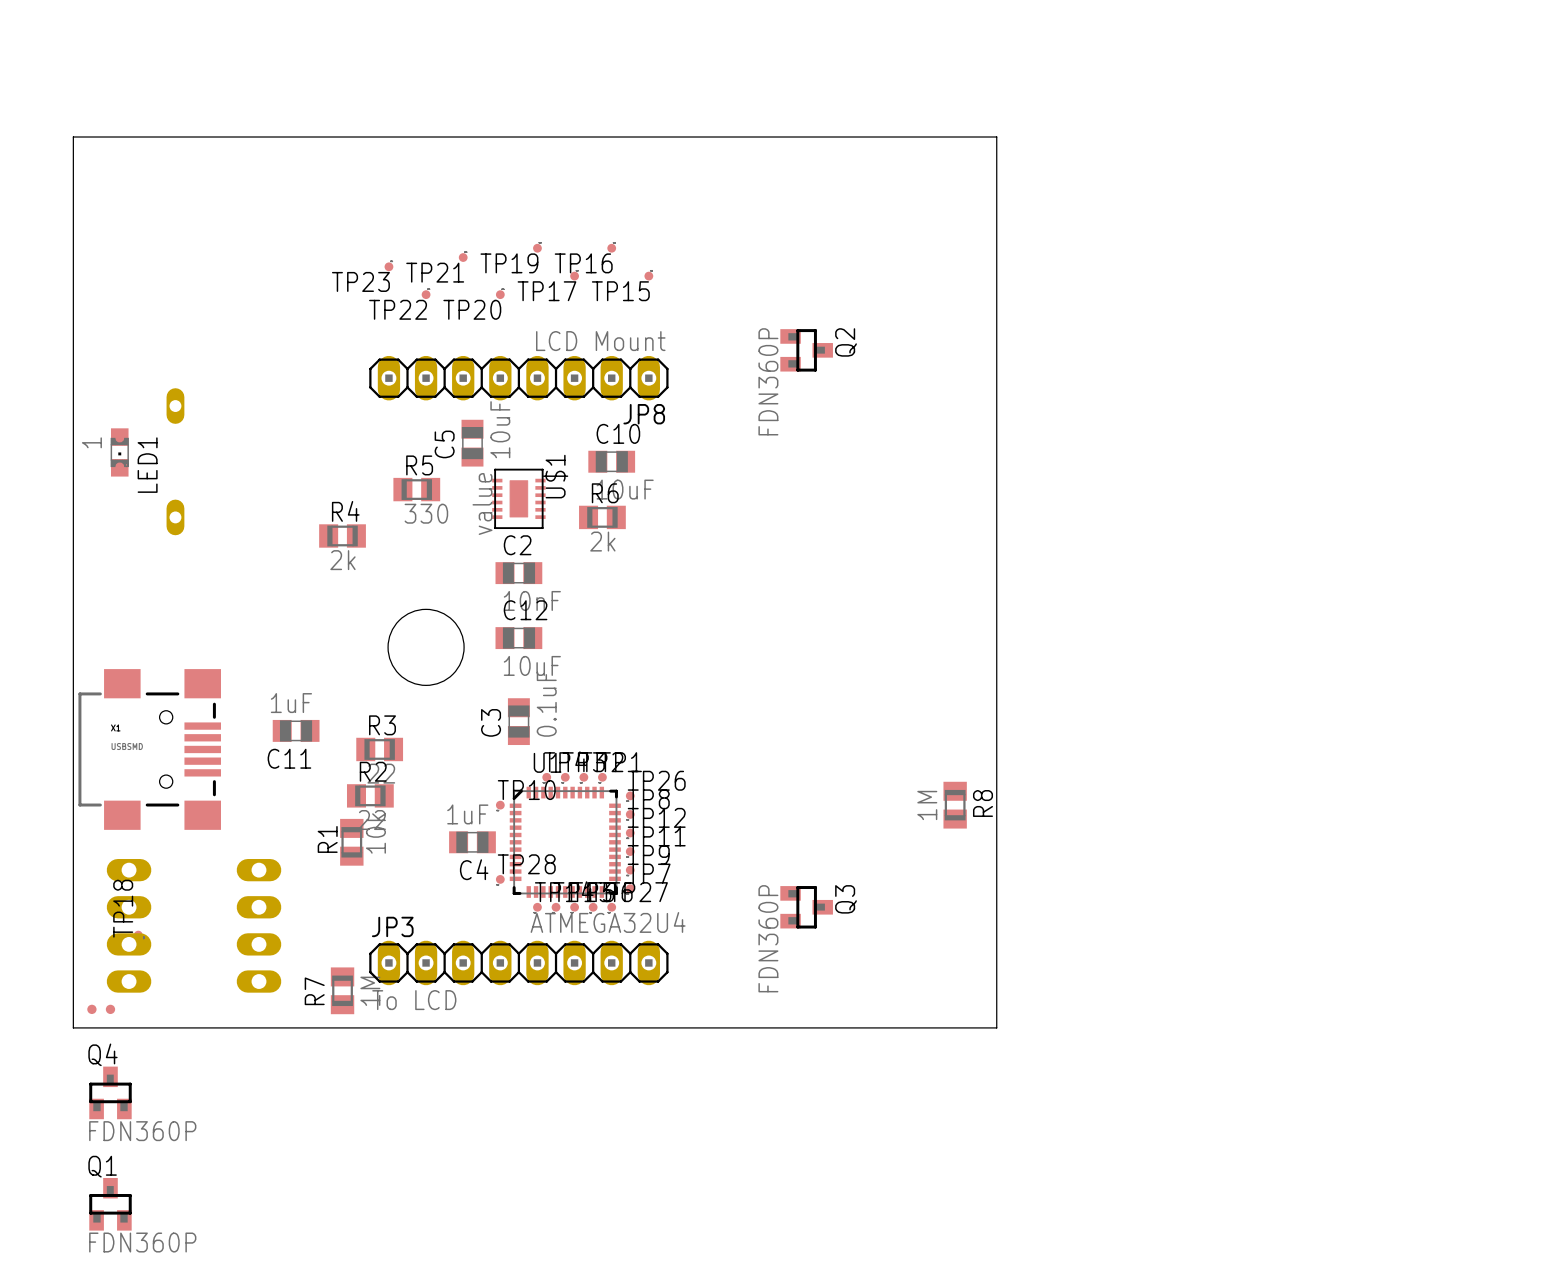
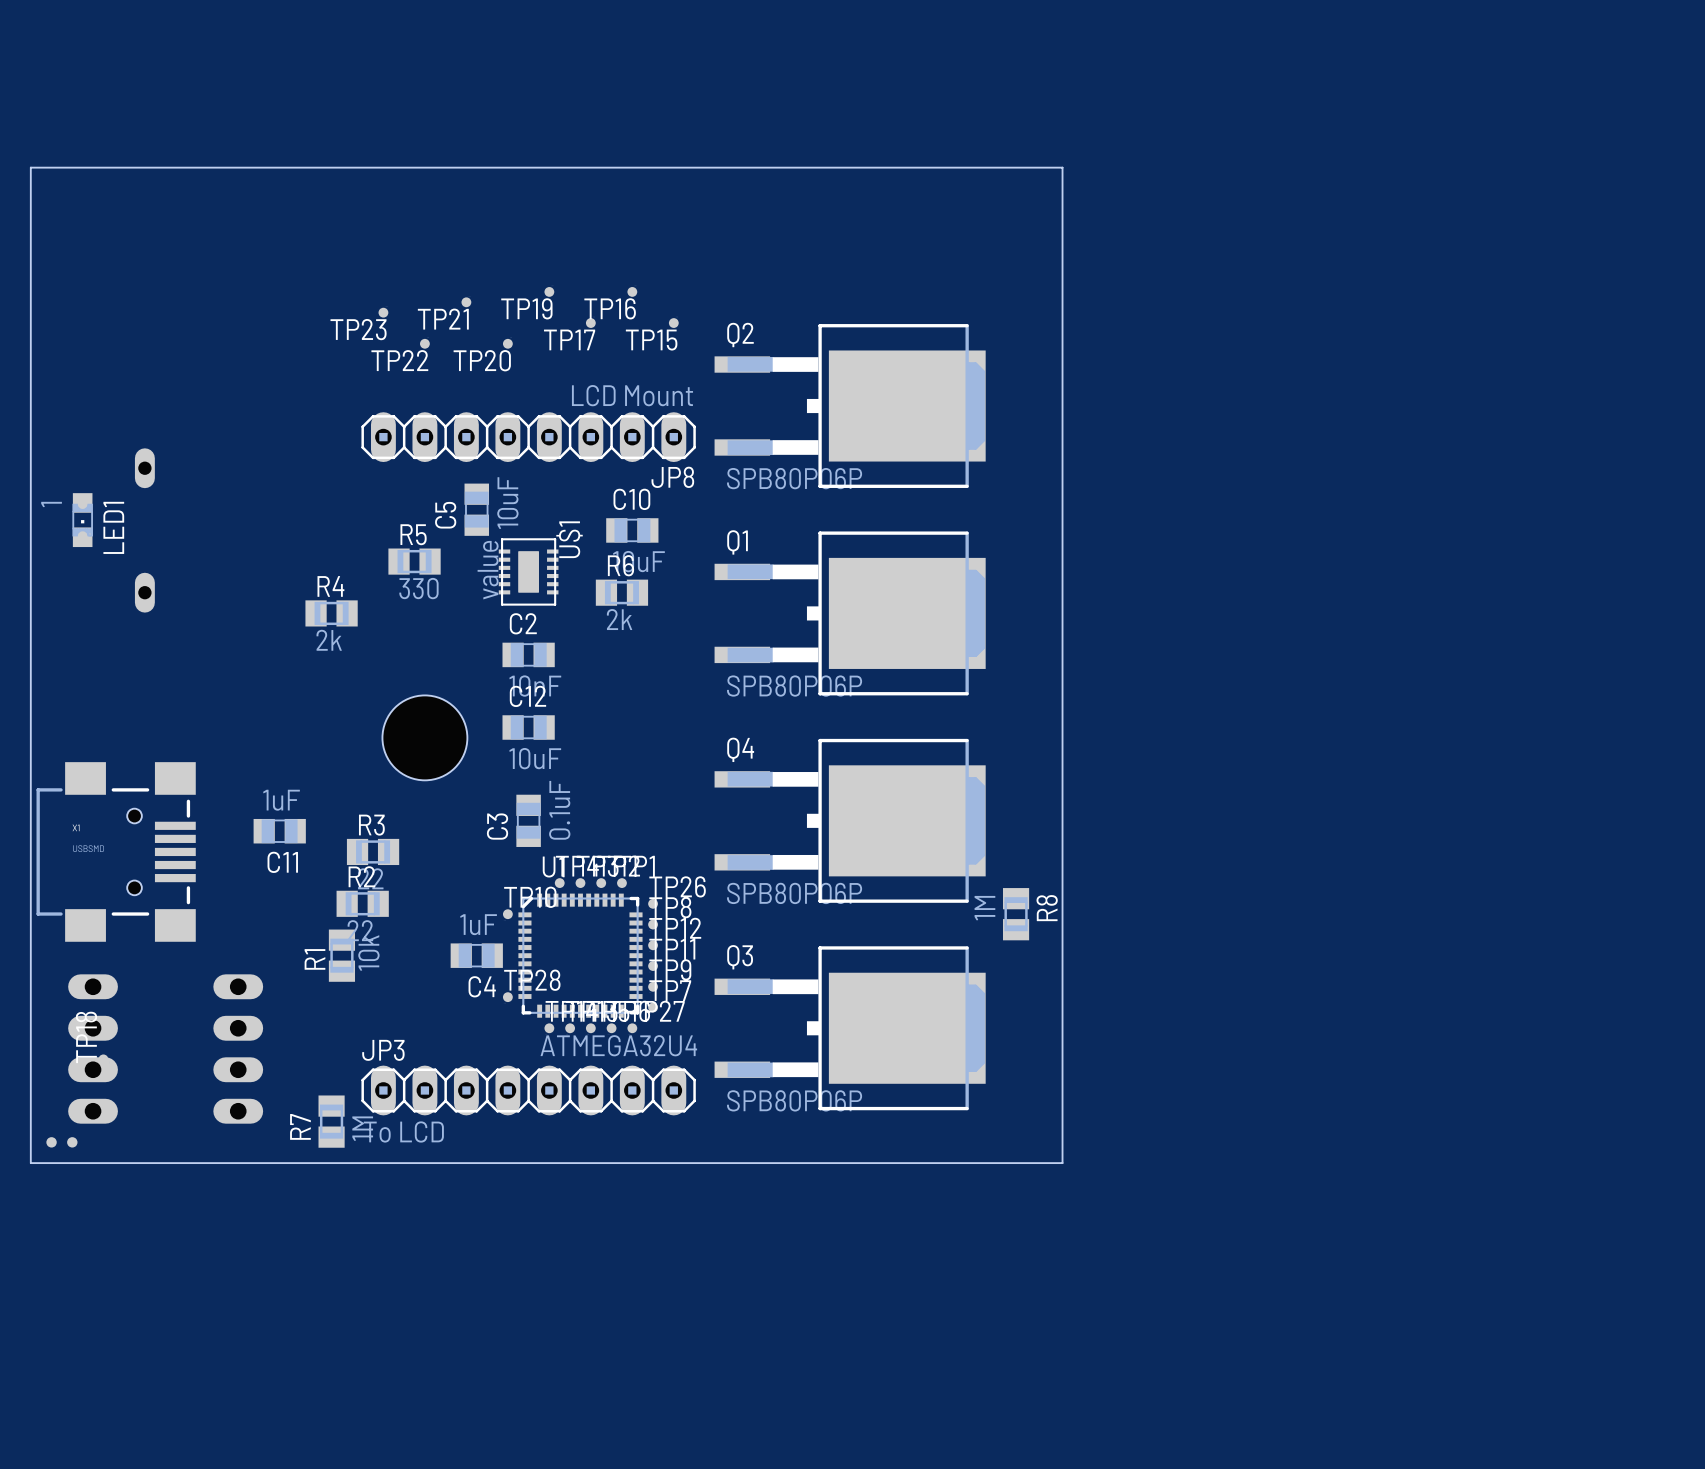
Q2 footprint: [780, 329, 833, 372] -> [714, 324, 986, 488]
Q2 name position: Q2 (846, 342) -> Q2 (740, 335)
Q2 value: FDN360P (768, 381) -> SPB80P06P (794, 478)
Q3 footprint: [780, 886, 833, 929] -> [714, 946, 986, 1111]
Q3 name position: Q3 (846, 899) -> Q3 (740, 957)
Q3 value: FDN360P (768, 938) -> SPB80P06P (794, 1100)
Q4 name position: Q4 (102, 1054) -> Q4 (740, 749)
Q4 footprint: [89, 1066, 132, 1120] -> [714, 738, 986, 903]
Q4 value: FDN360P (142, 1131) -> SPB80P06P (794, 893)
Q1 name position: Q1 (102, 1166) -> Q1 (737, 542)
Q1 footprint: [89, 1177, 132, 1231] -> [714, 531, 986, 696]
Q1 value: FDN360P (142, 1242) -> SPB80P06P (794, 686)

